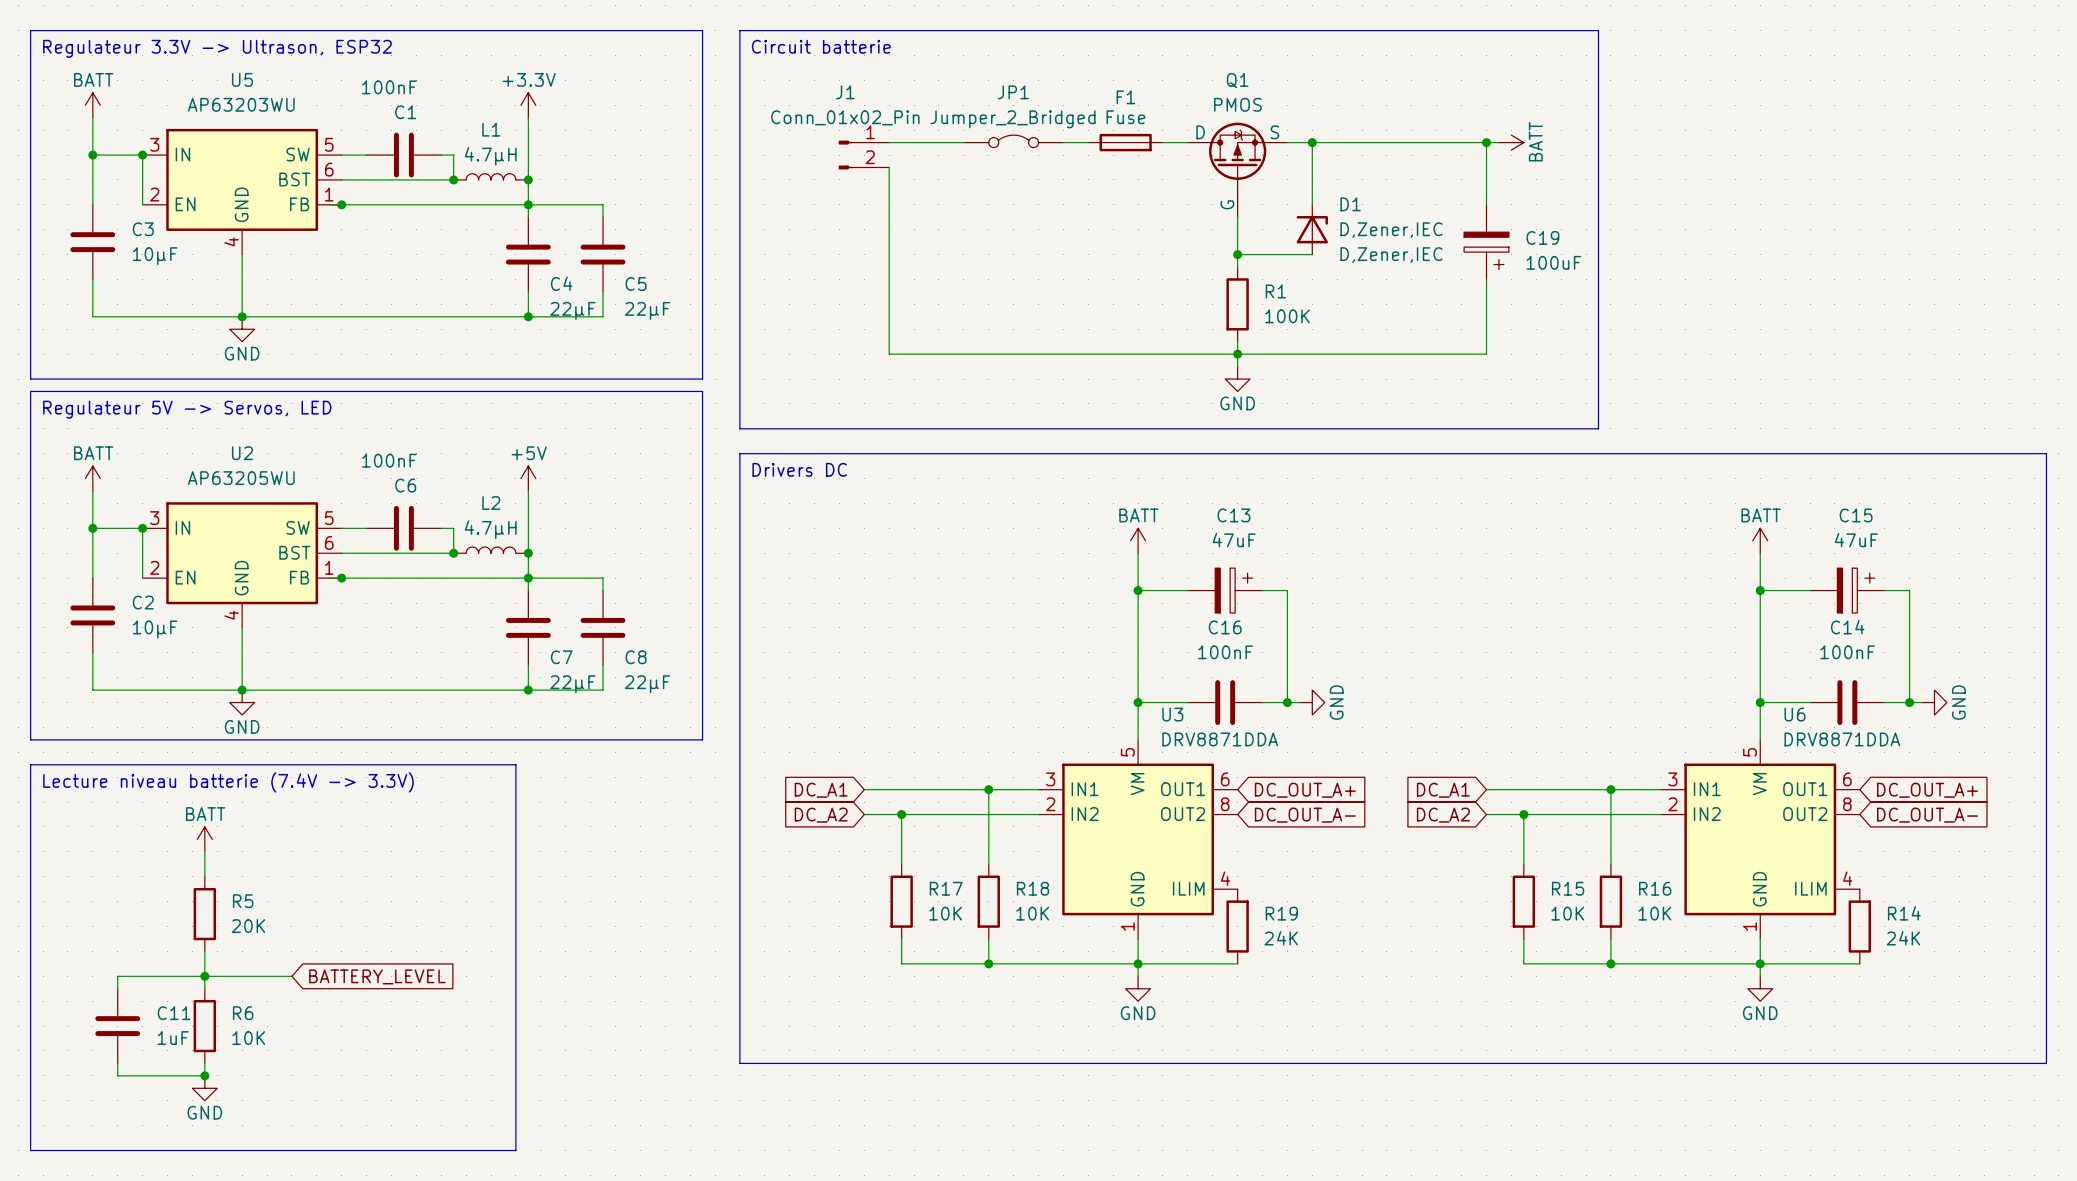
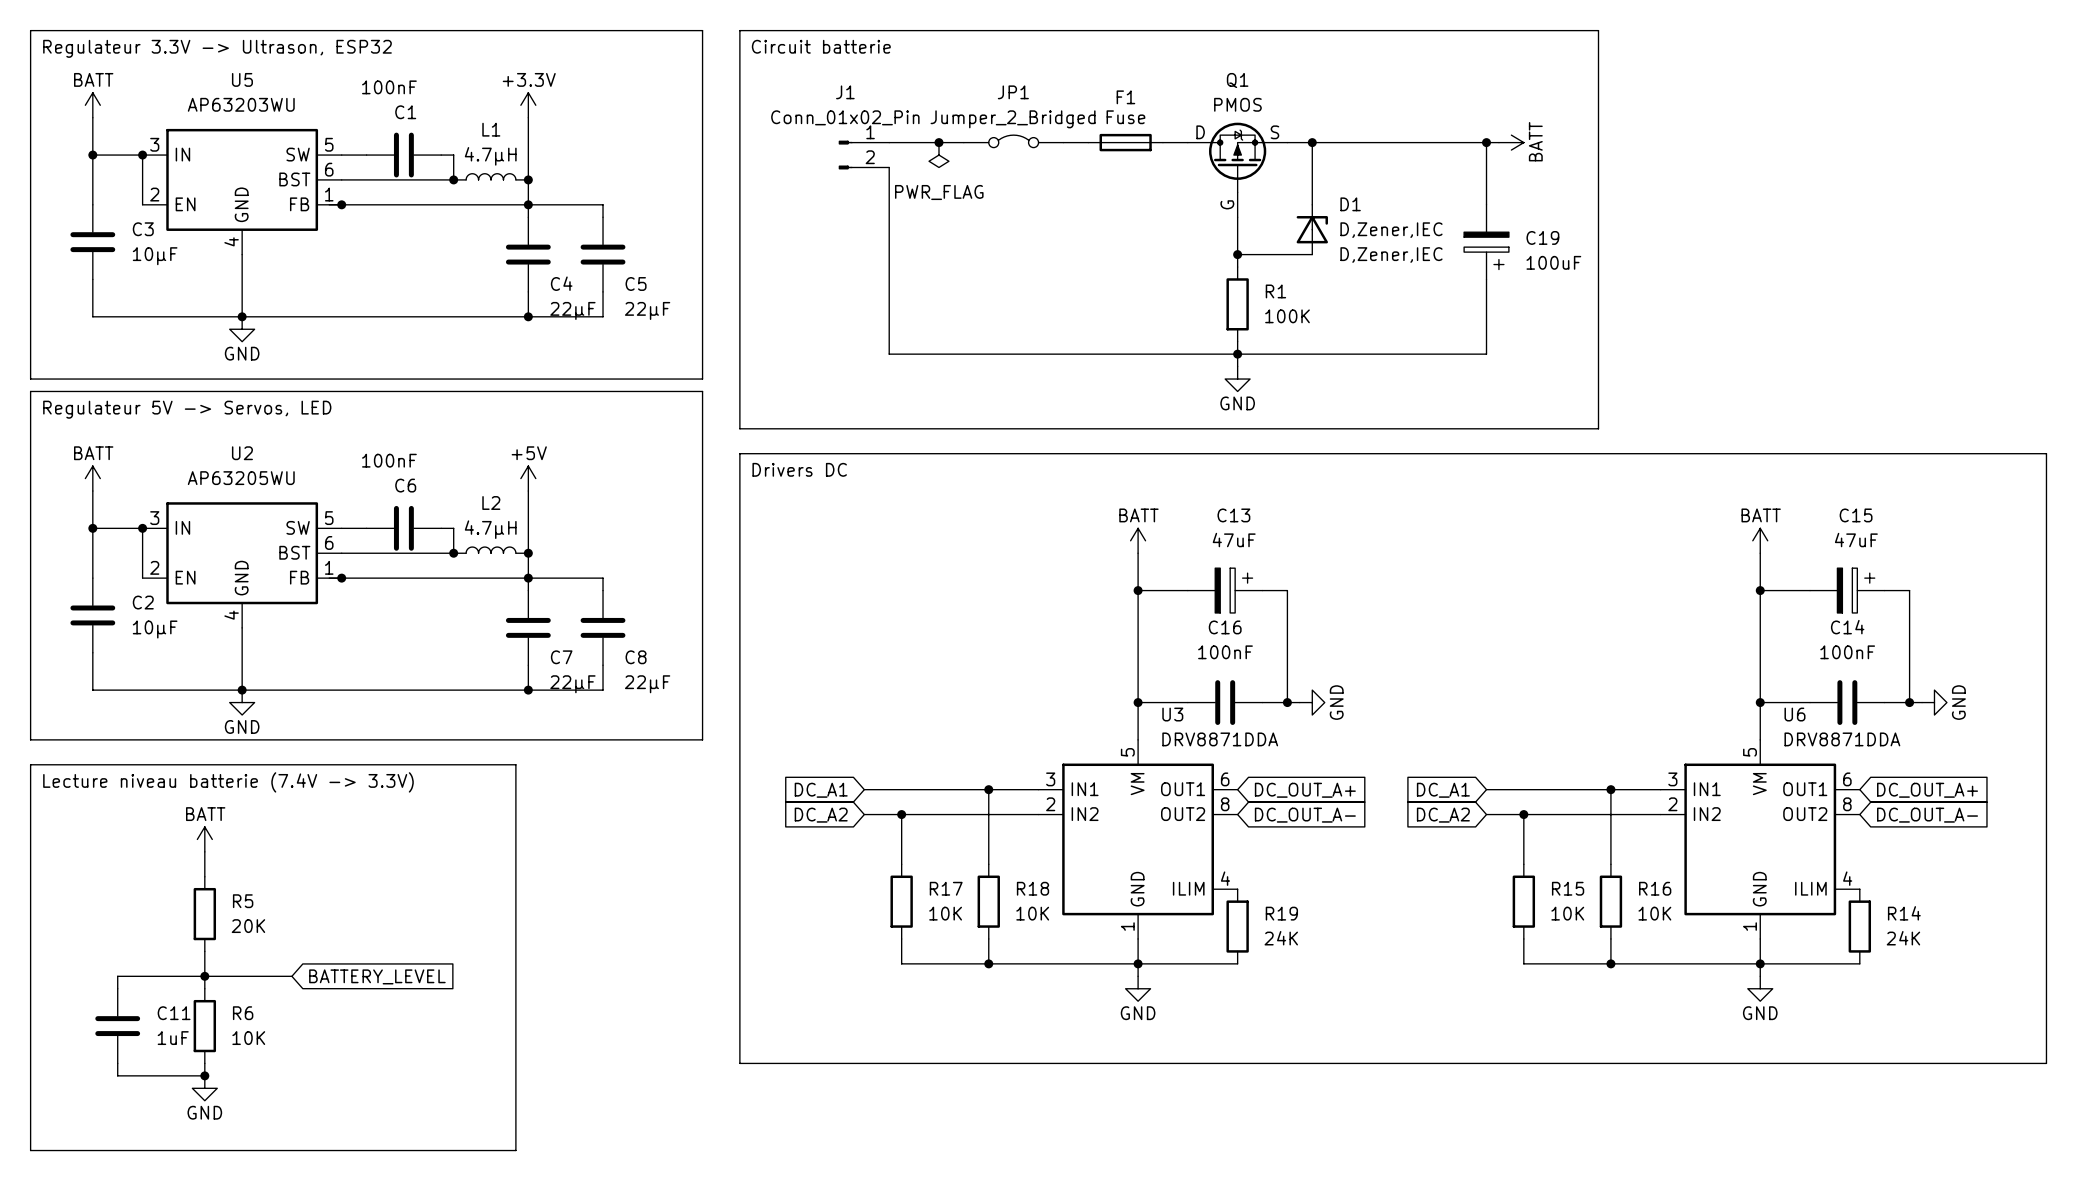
junction: none -> (938, 142)
power symbol: none -> PWR_FLAG (938, 155)

